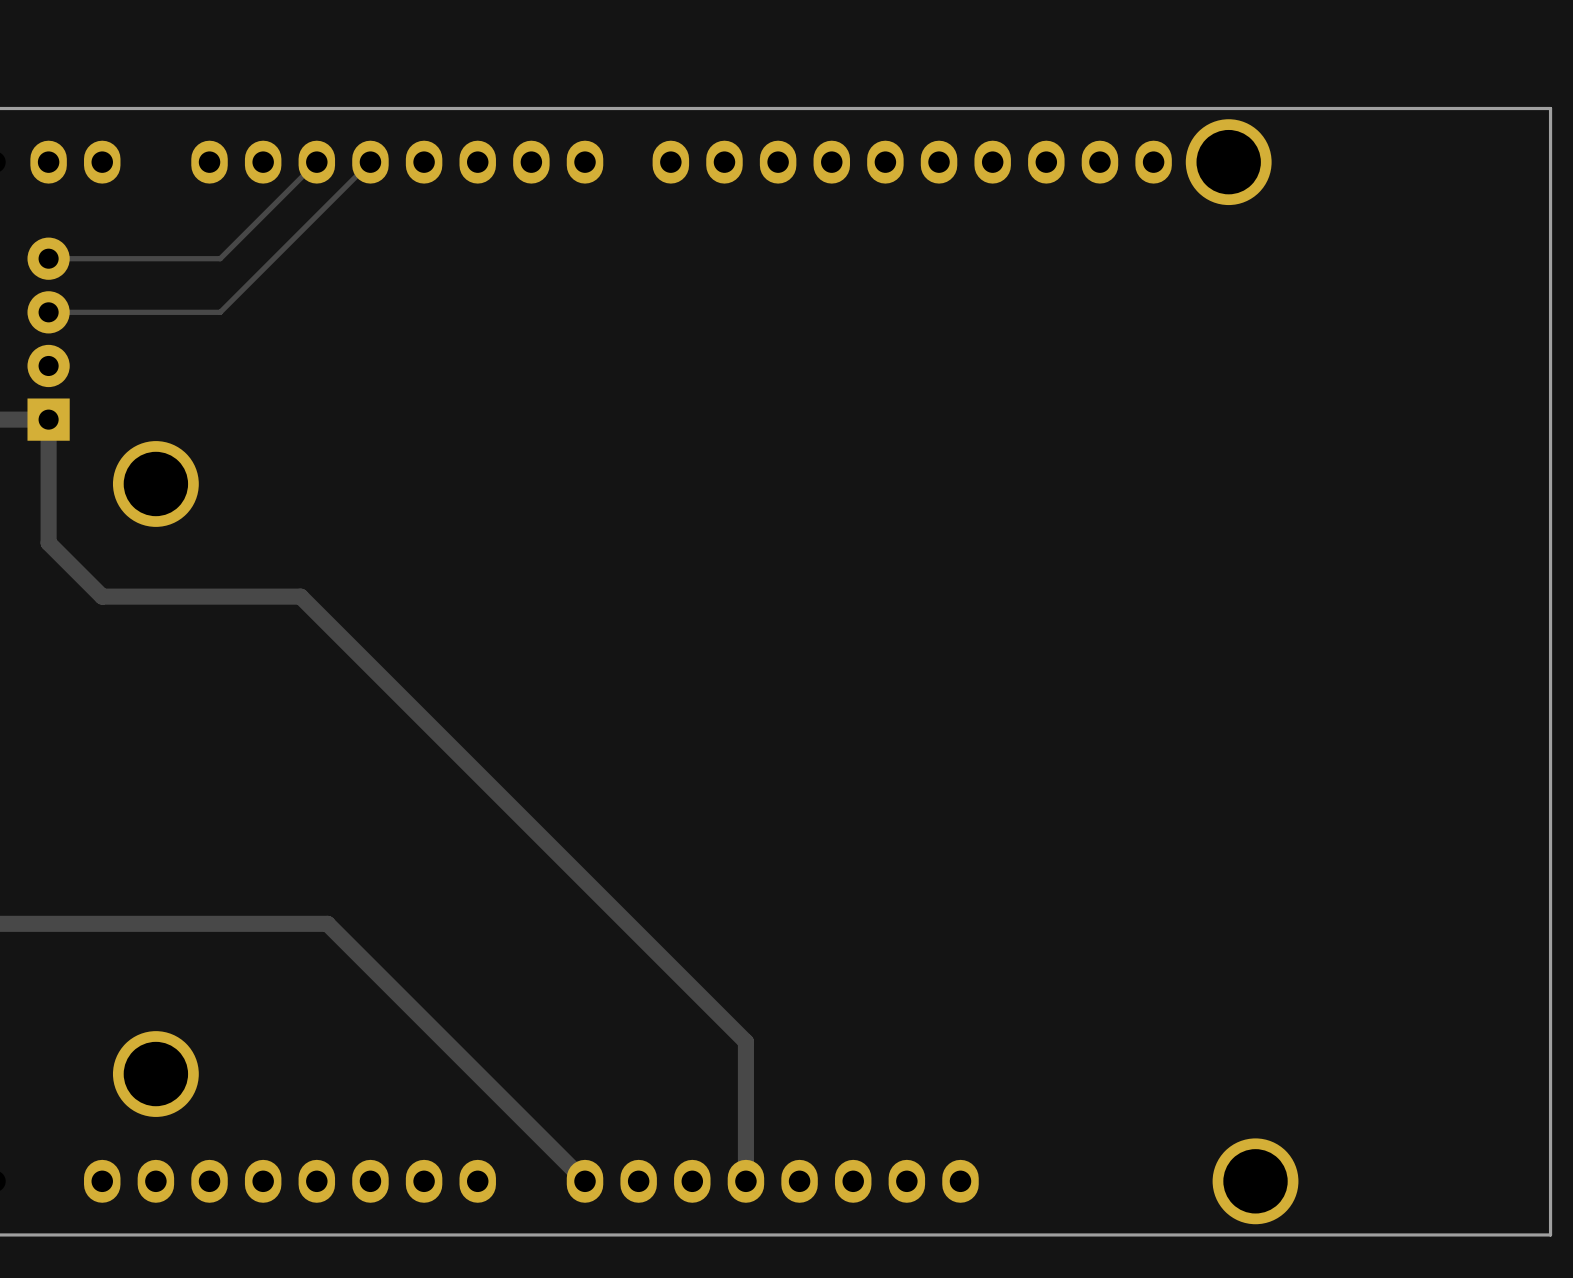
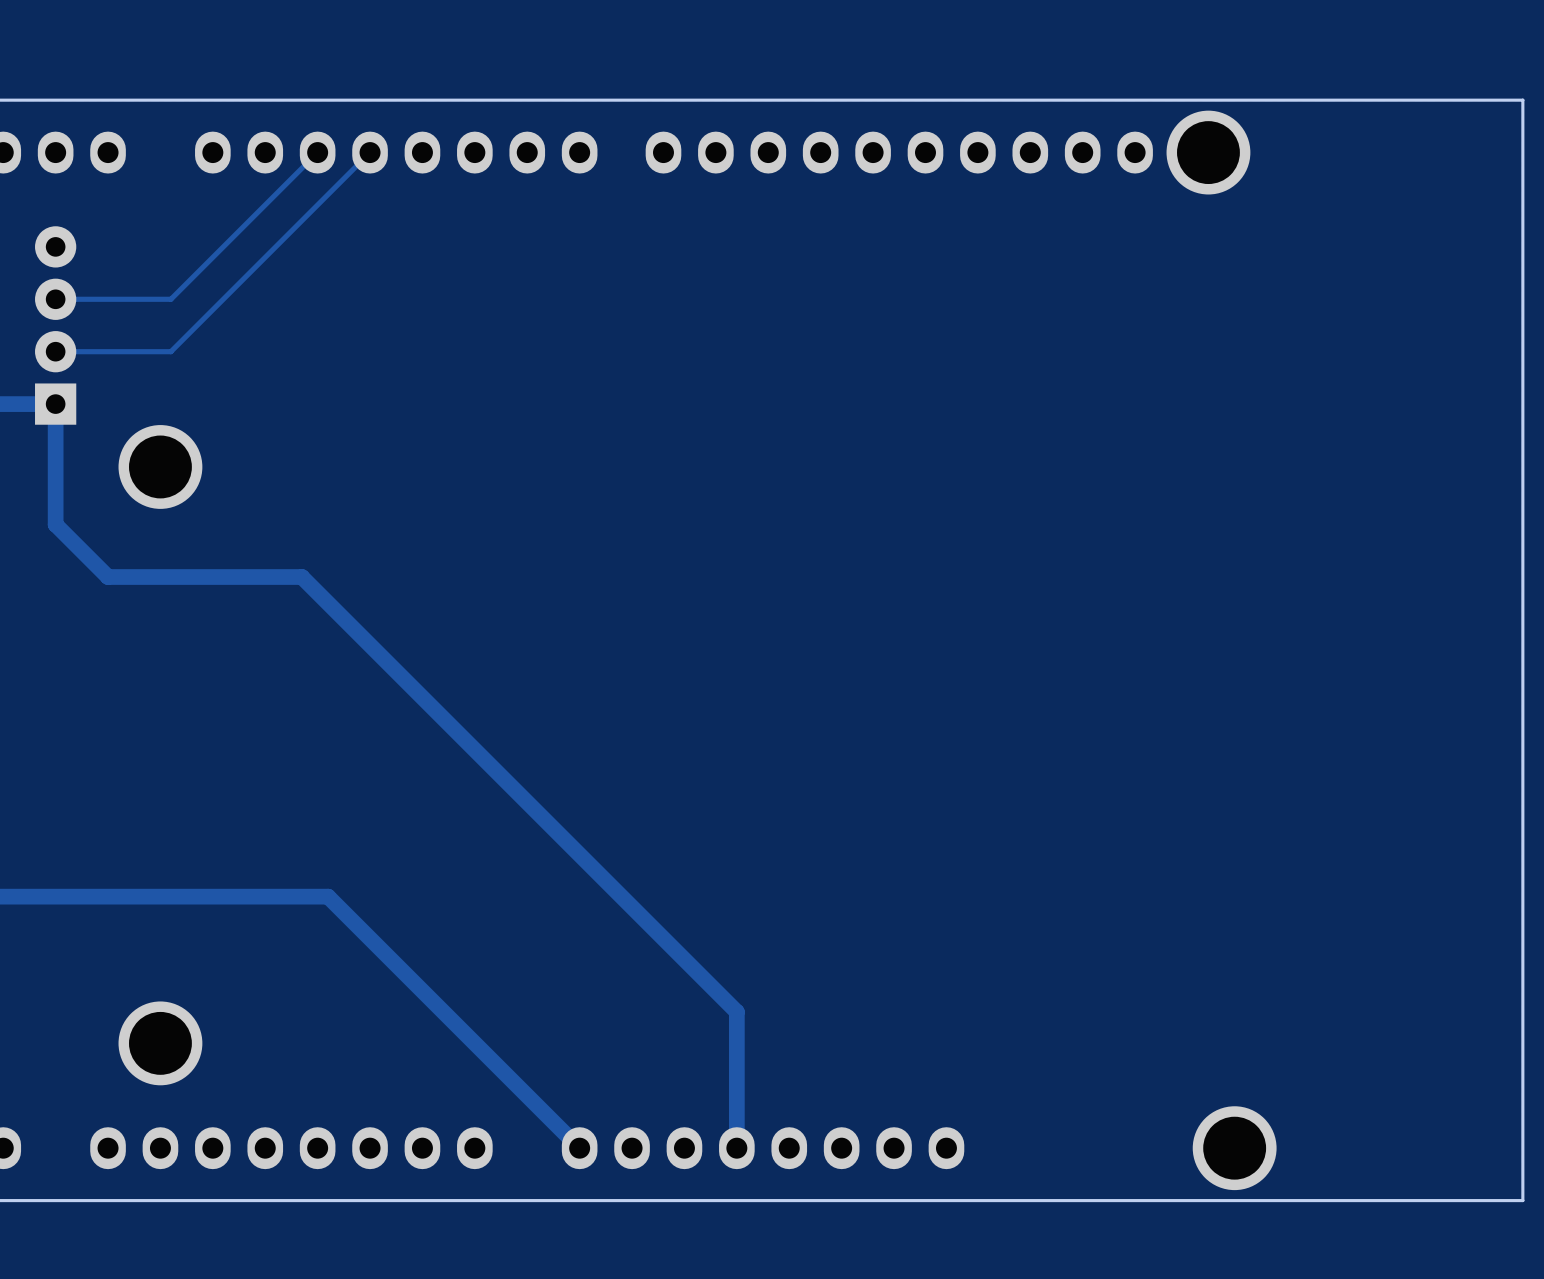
track: (220, 258) (48, 258) -> none
track: (220, 312) (166, 312) -> (223, 246) (170, 299)
track: none -> (223, 299) (170, 351) (55, 351)

